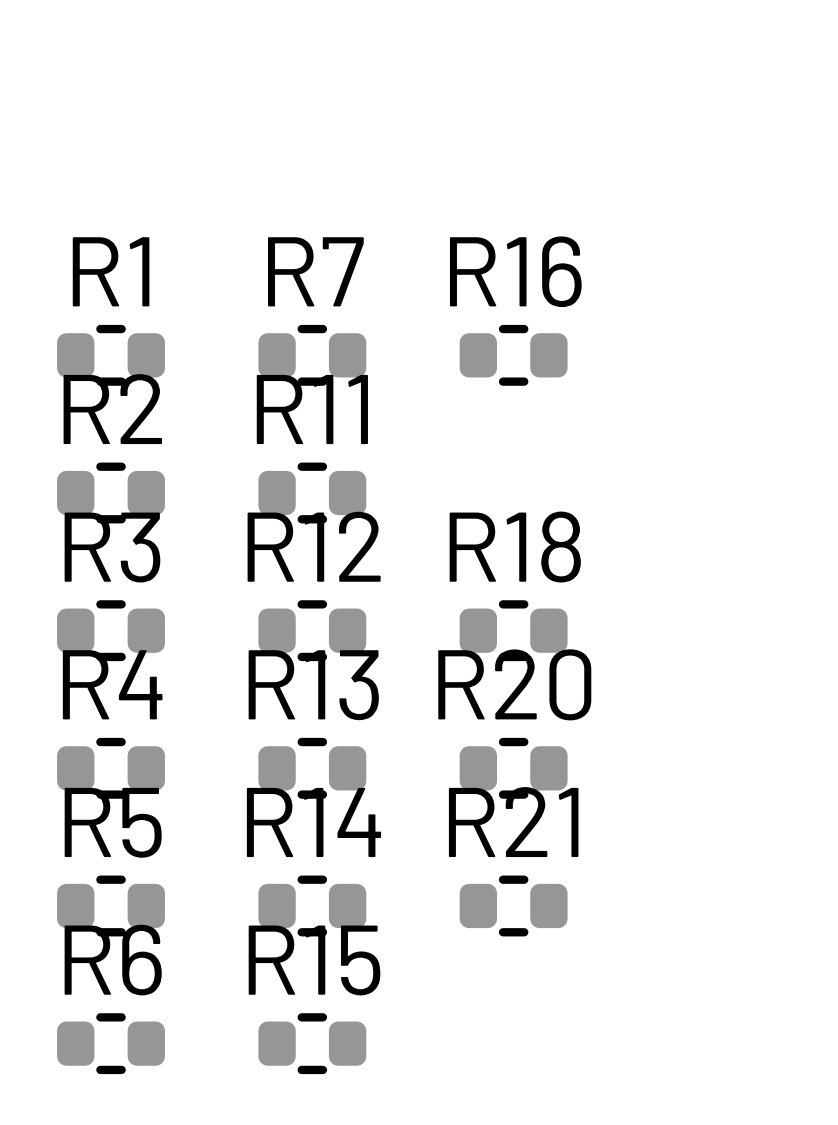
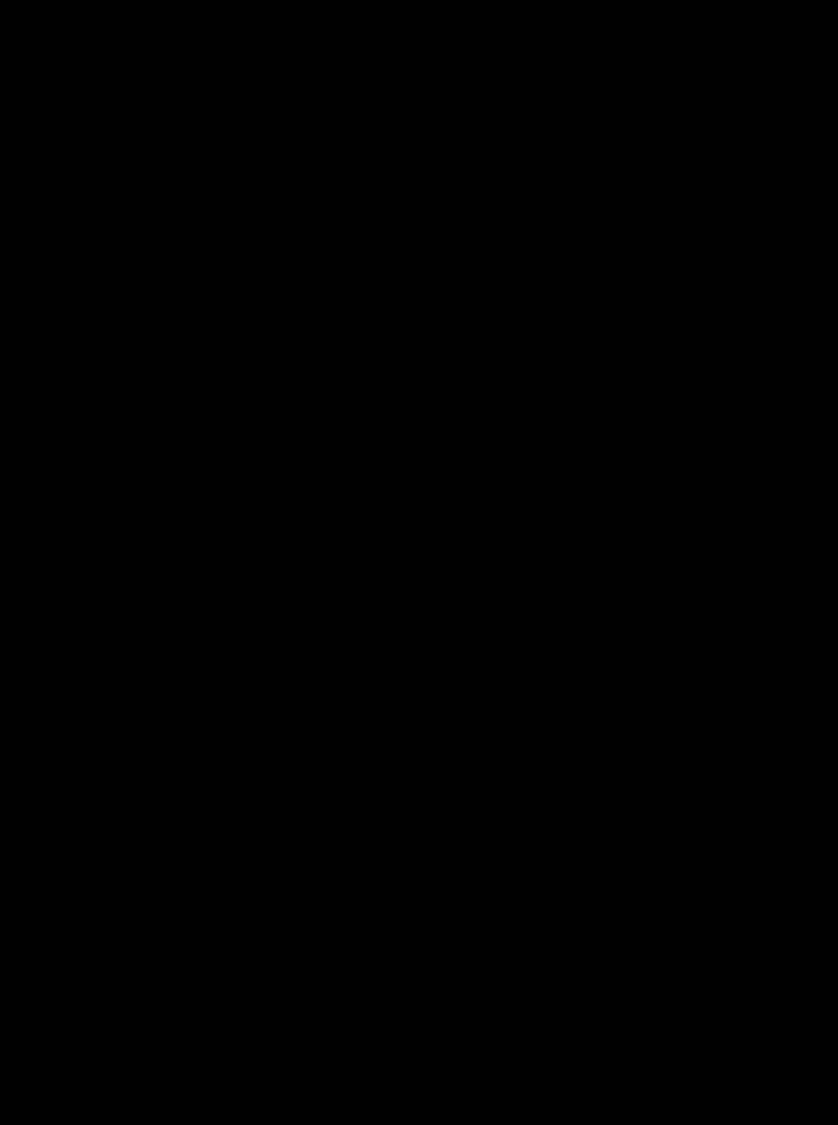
R1: (111, 355) -> none
R7: (312, 355) -> none
R16: (513, 355) -> none
R2: (111, 493) -> none
R11: (312, 493) -> none
R3: (111, 630) -> none
R12: (312, 630) -> none
R18: (513, 630) -> none
R4: (111, 768) -> none
R13: (312, 768) -> none
R20: (513, 768) -> none
R5: (111, 905) -> none
R14: (312, 905) -> none
R21: (513, 905) -> none
R6: (111, 1043) -> none
R15: (312, 1043) -> none

